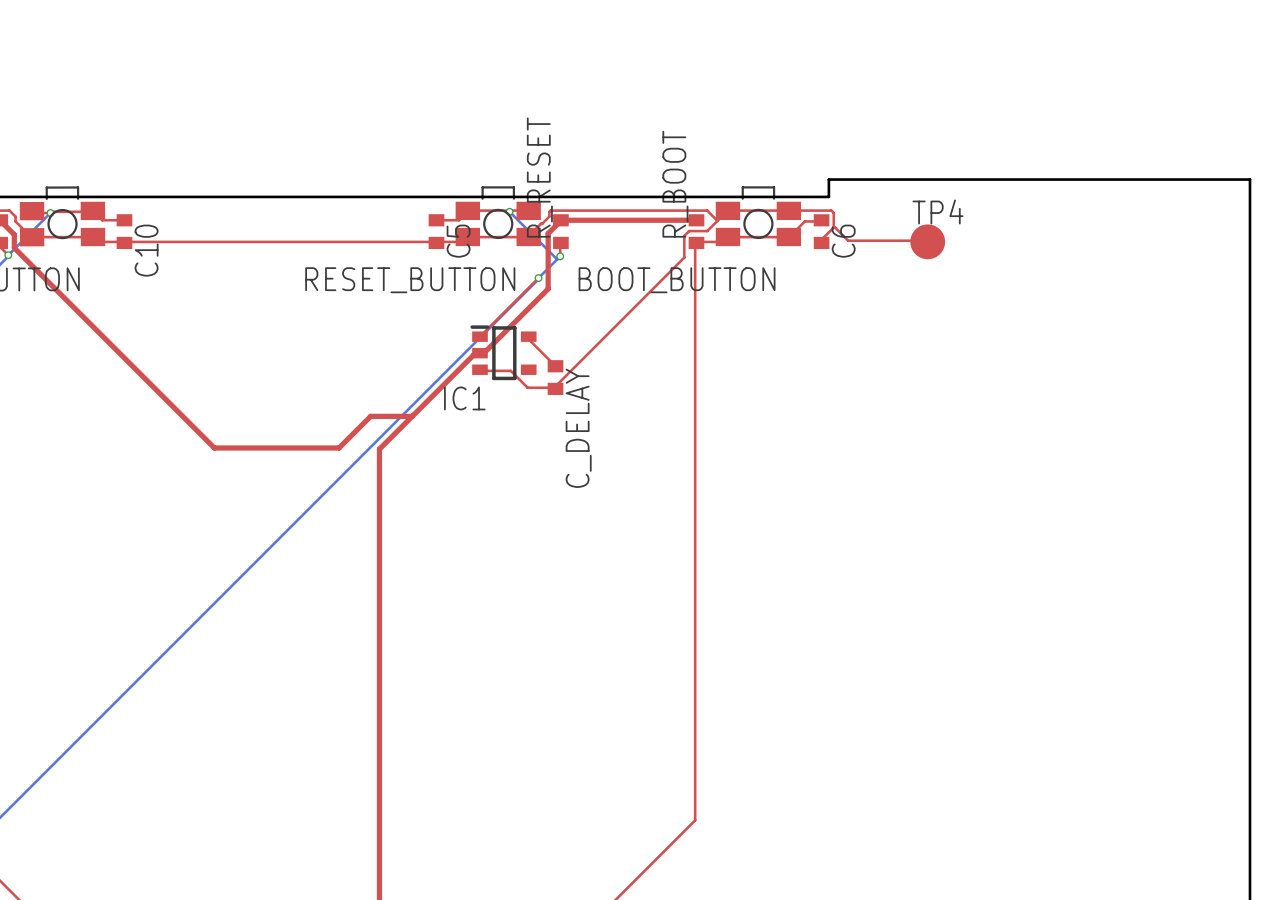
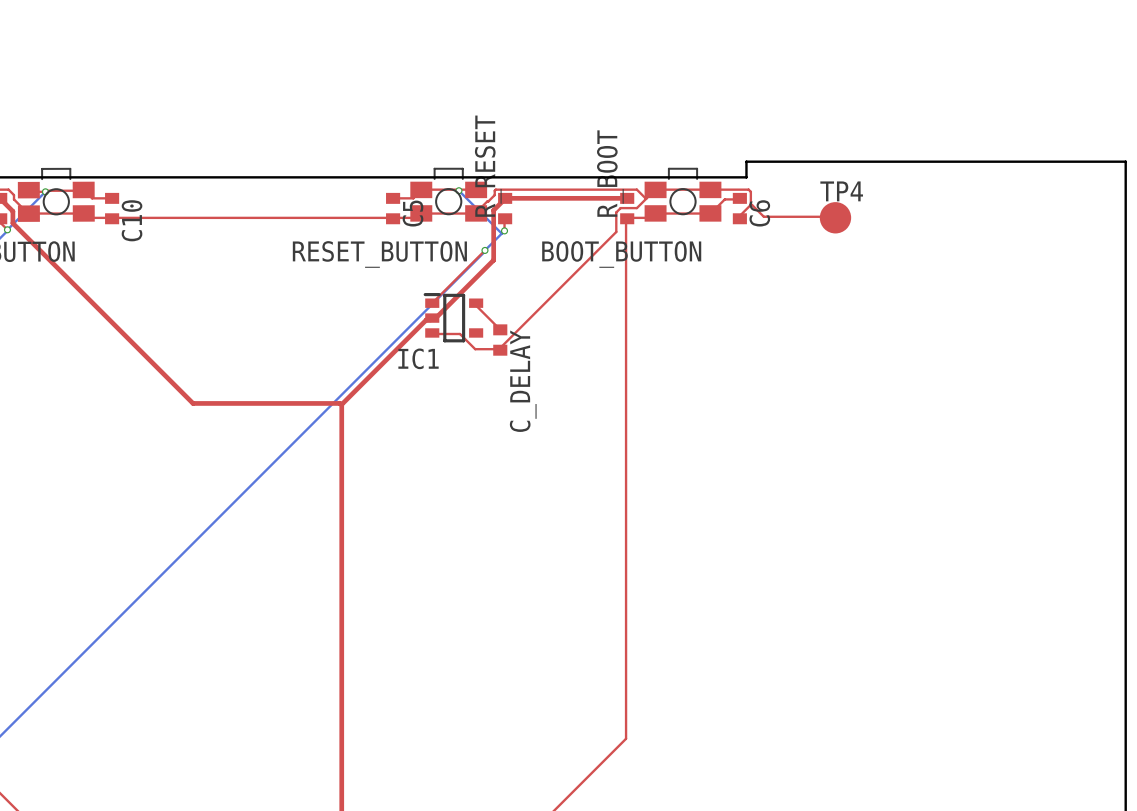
top track: (412, 416) (370, 416) (339, 447) -> (341, 404) (305, 403)

